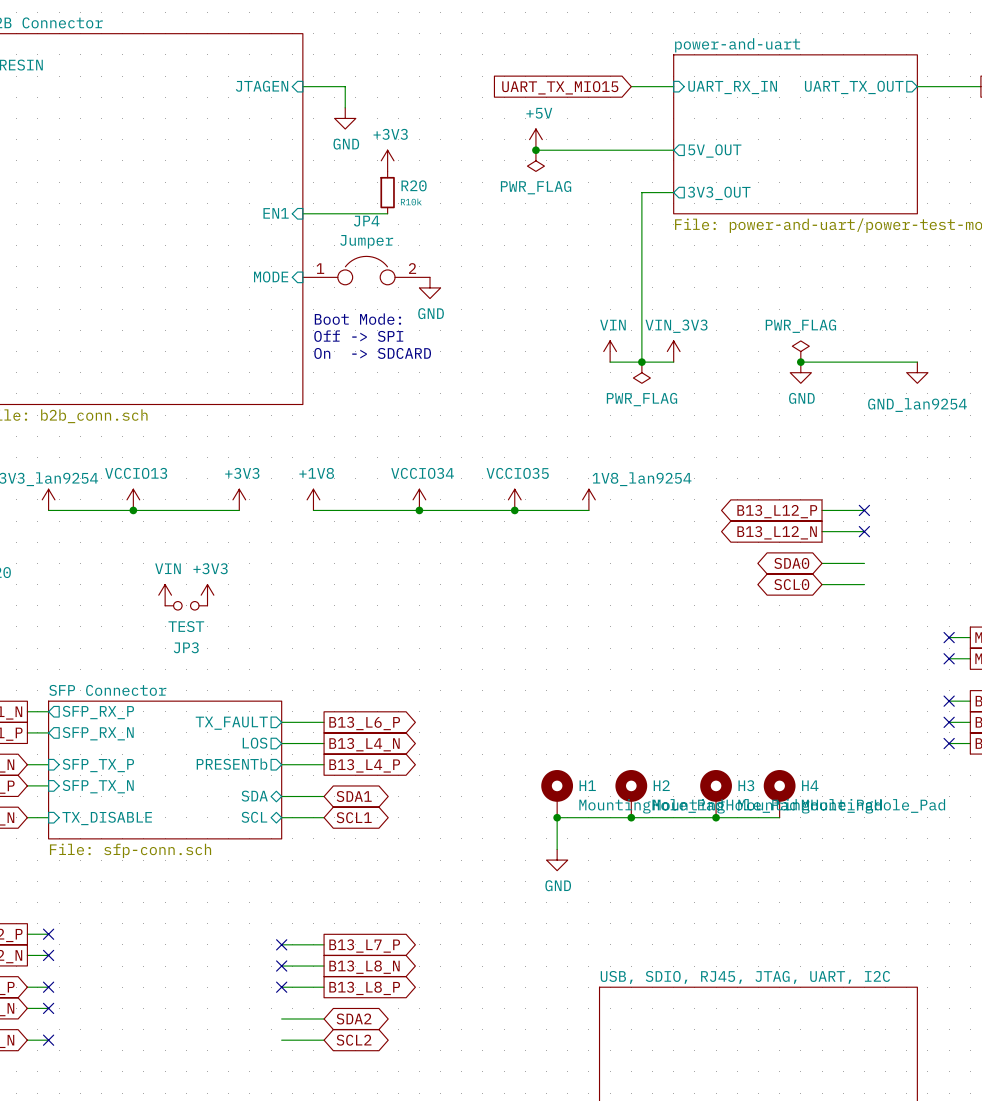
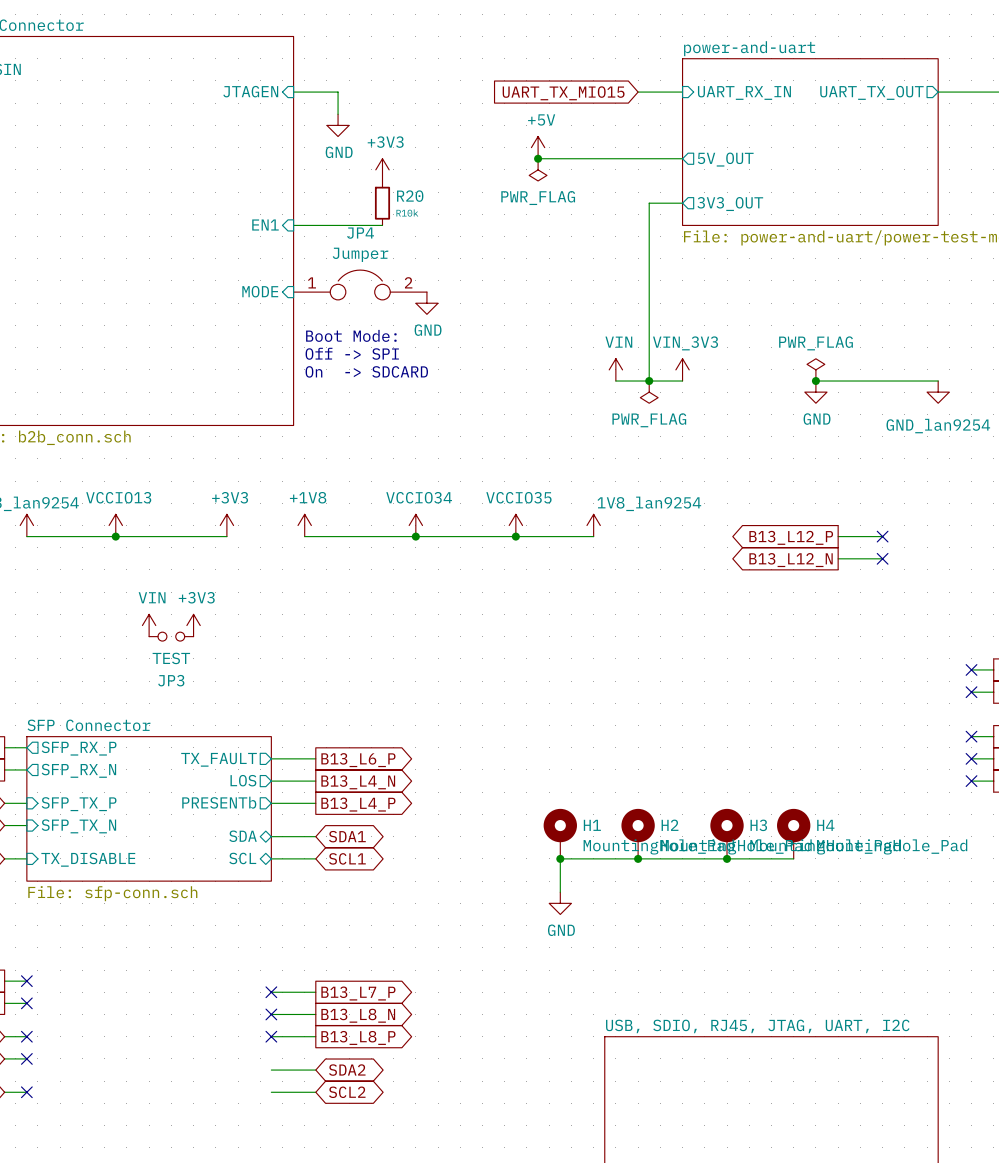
global label: SDA0 (791, 563) -> none
wire: (822, 563) (864, 563) -> none
global label: SCL0 (791, 584) -> none
wire: (822, 584) (864, 584) -> none

